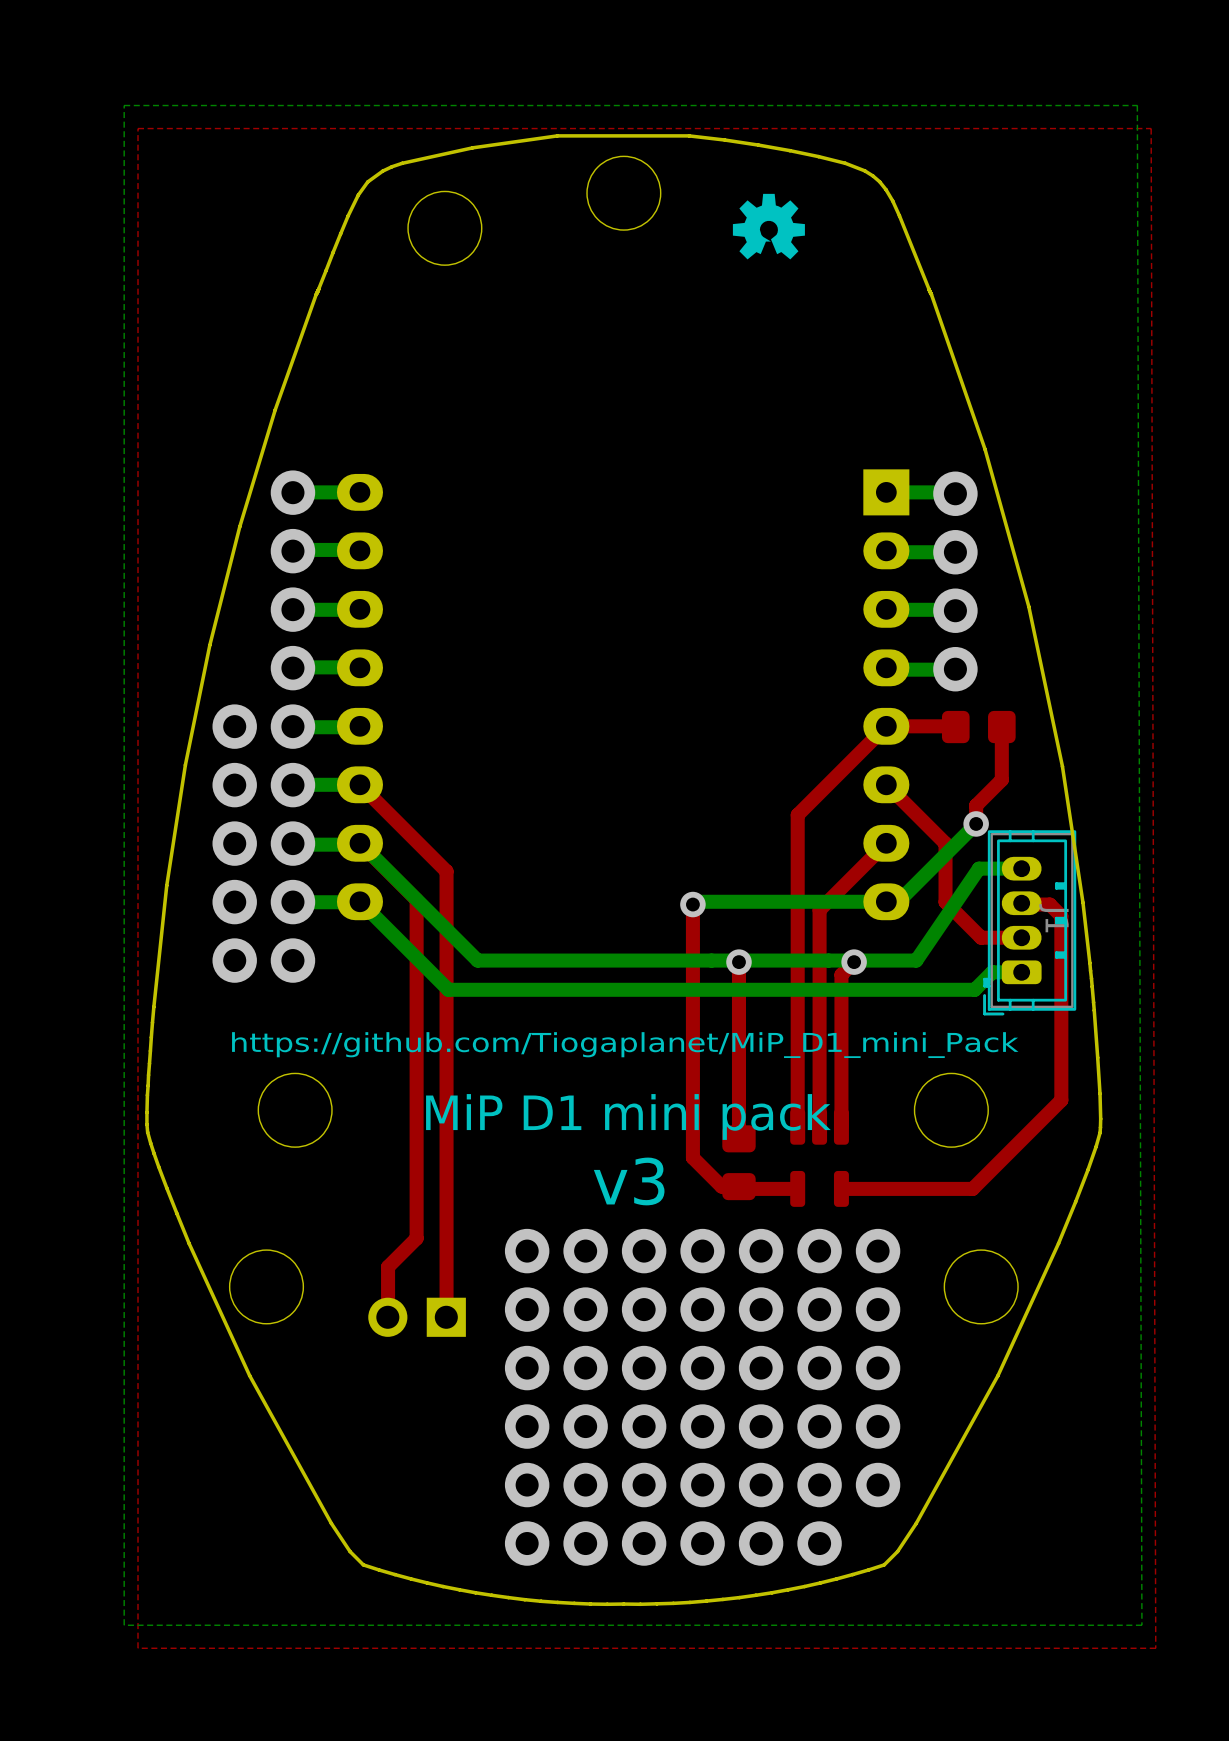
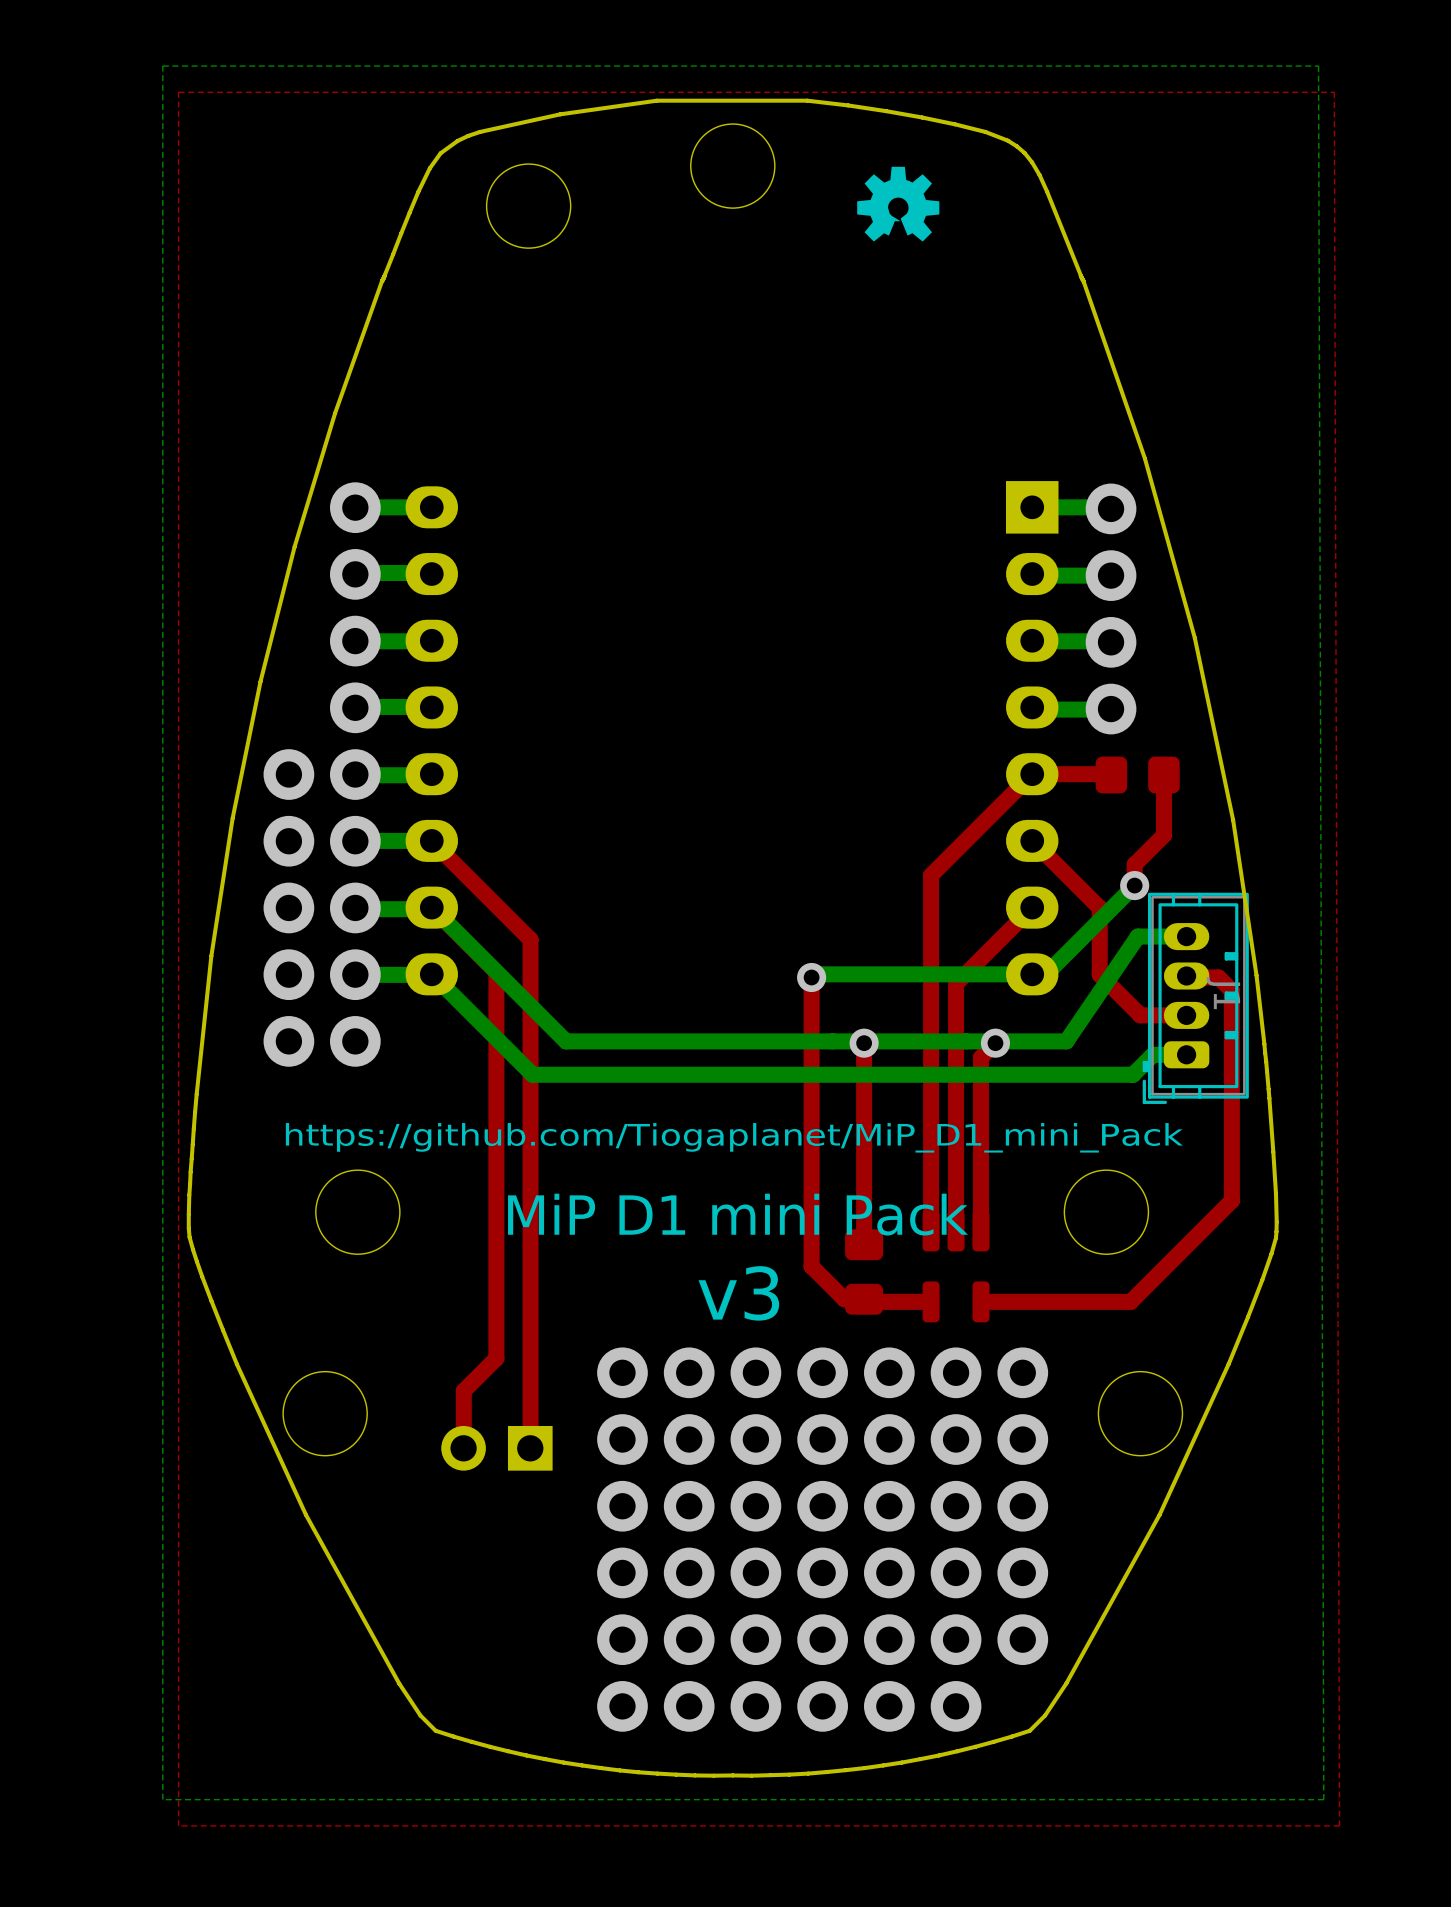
text: MiP D1 mini pack (628, 1116) -> MiP D1 mini Pack (738, 1214)

